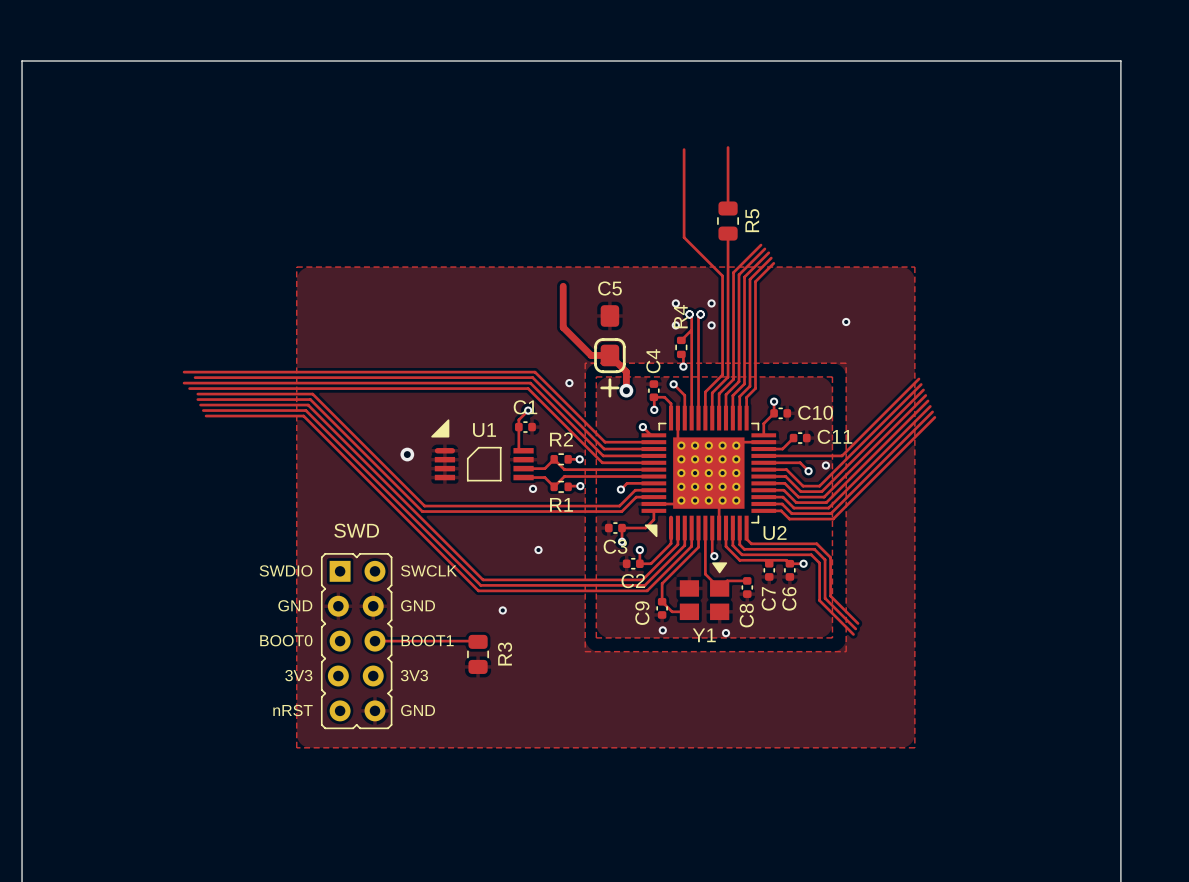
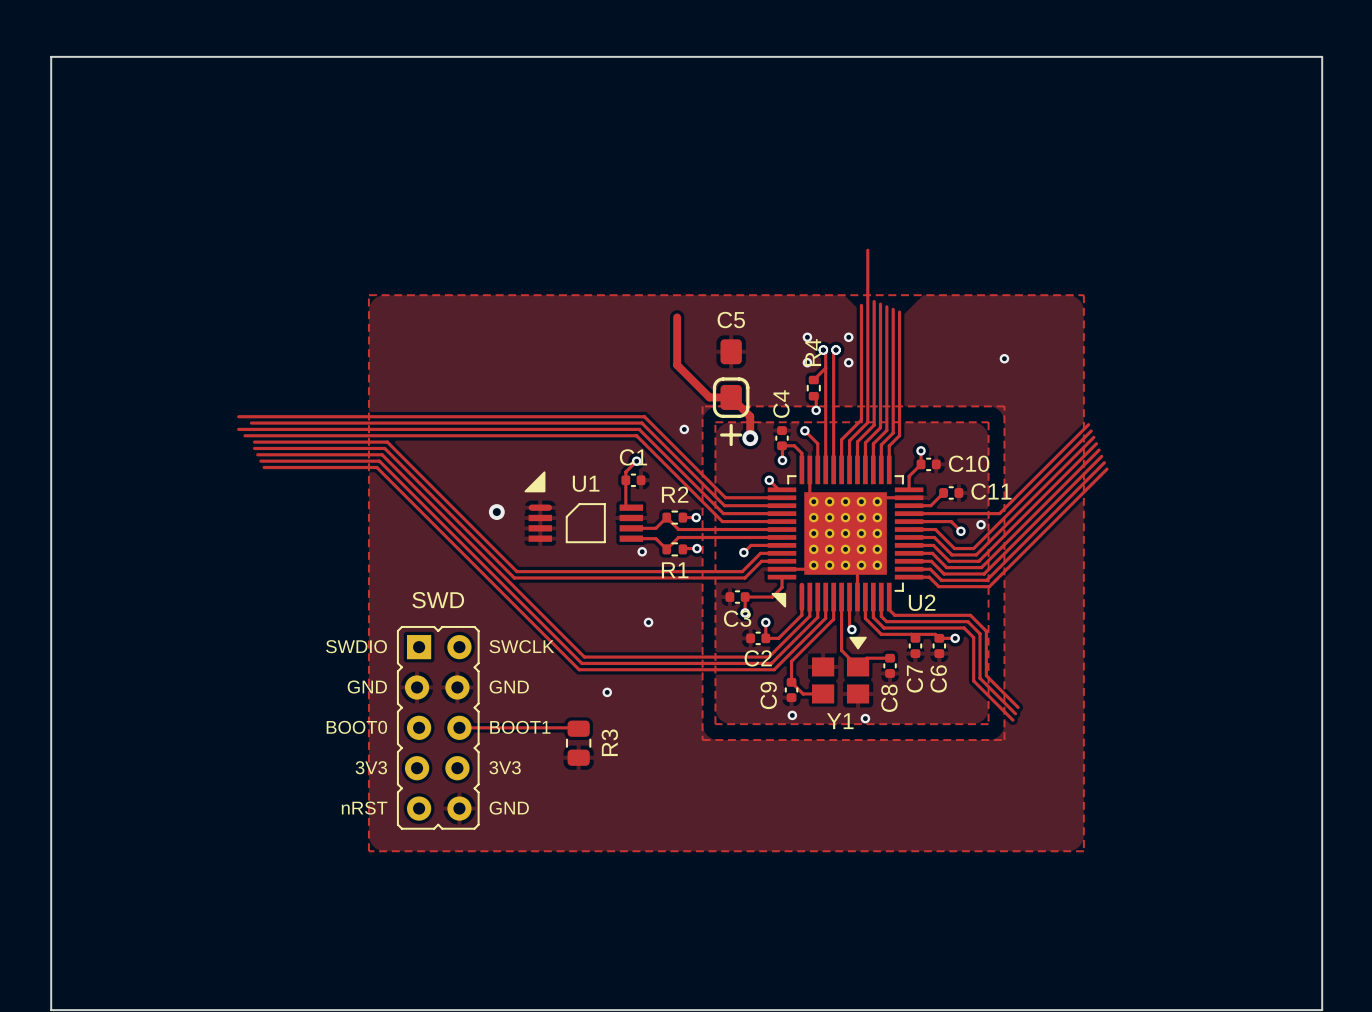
track: (728, 147) (728, 208) -> none
track: (684, 149) (684, 237) (722, 275) -> none
R5: (728, 221) -> none
track: (761, 245) (733, 272) -> none
track: (764, 248) (739, 274) -> none
track: (768, 252) (744, 277) -> none
track: (771, 258) (750, 279) -> none
track: (773, 263) (755, 281) -> none

